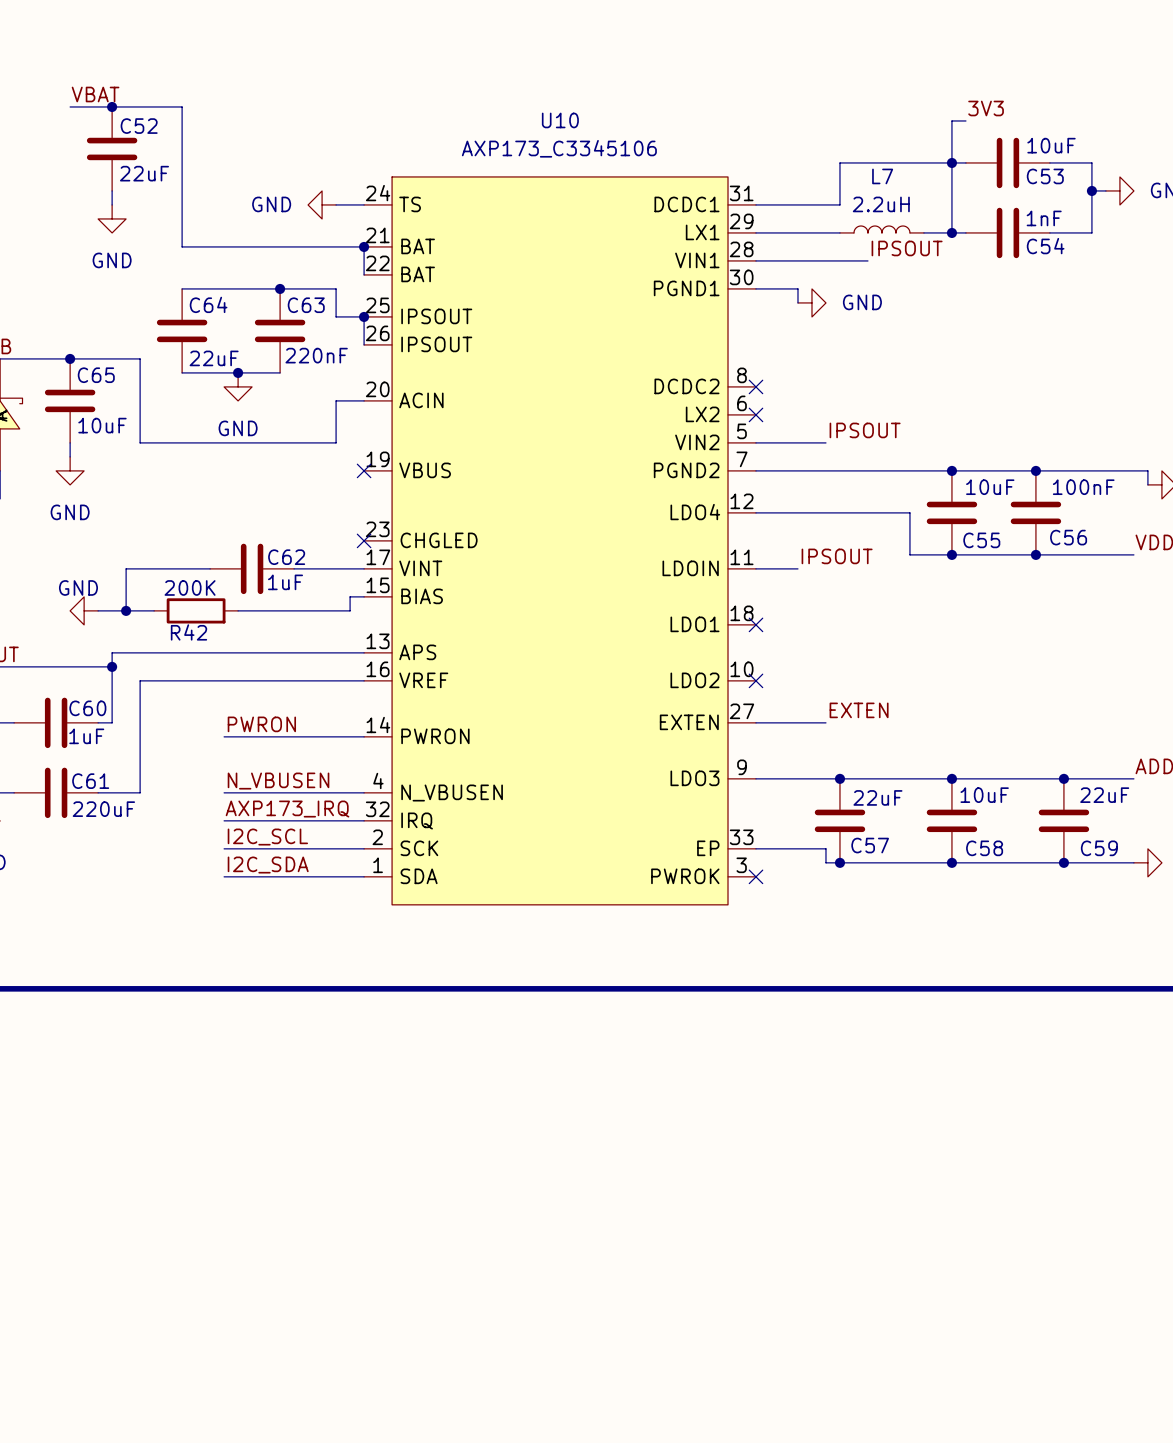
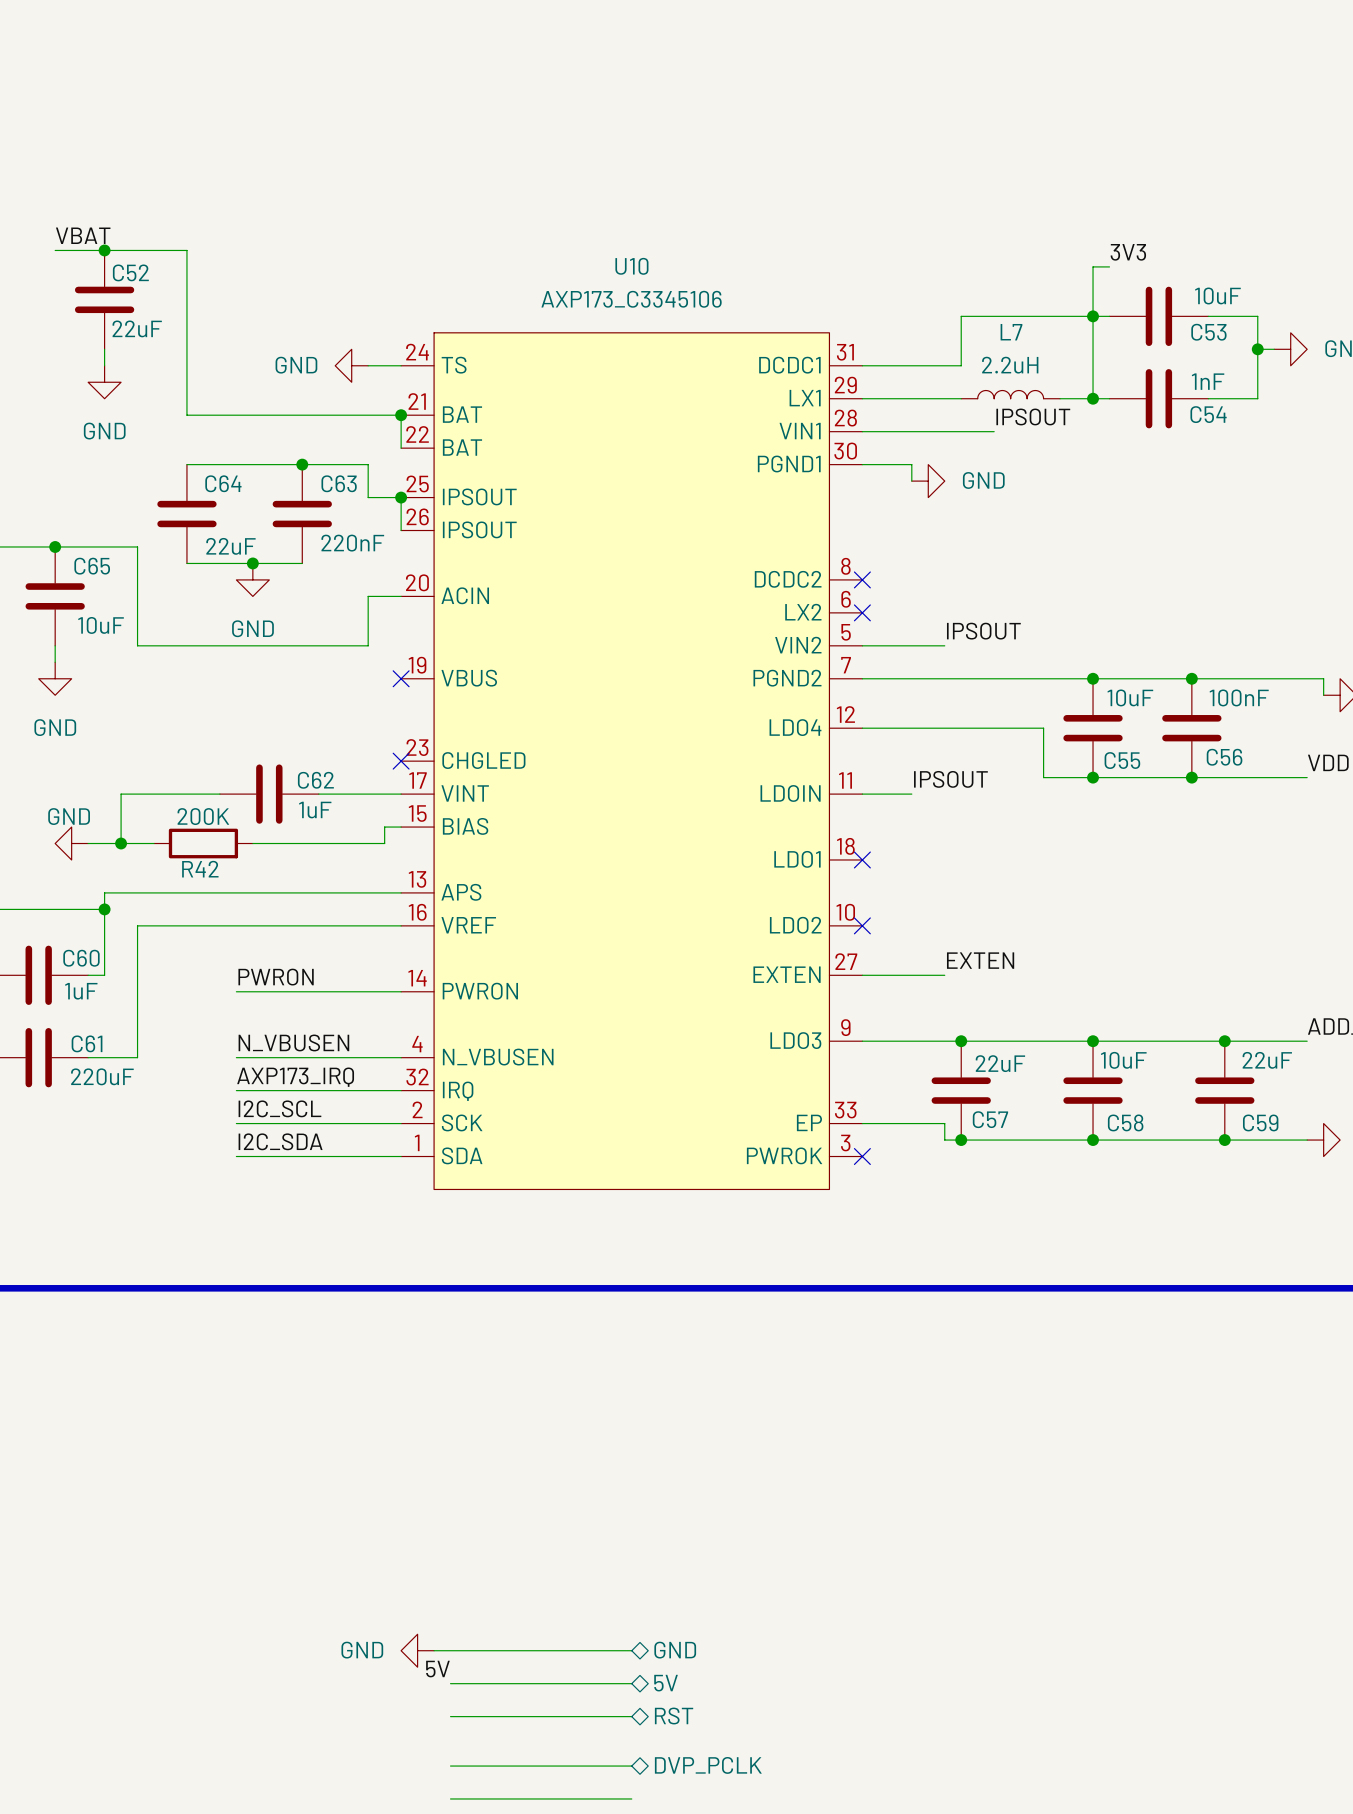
power symbol: none -> GND (417, 1650)
wire: none -> (434, 1650) (631, 1650)
sheet pin: none -> GND (675, 1650)
label: none -> 5V (437, 1669)
wire: none -> (450, 1683) (631, 1683)
sheet pin: none -> 5V (666, 1683)
wire: none -> (450, 1716) (631, 1716)
sheet pin: none -> RST (674, 1716)
wire: none -> (450, 1766) (631, 1766)
sheet pin: none -> DVP_PCLK (708, 1765)
wire: none -> (450, 1798) (631, 1798)

